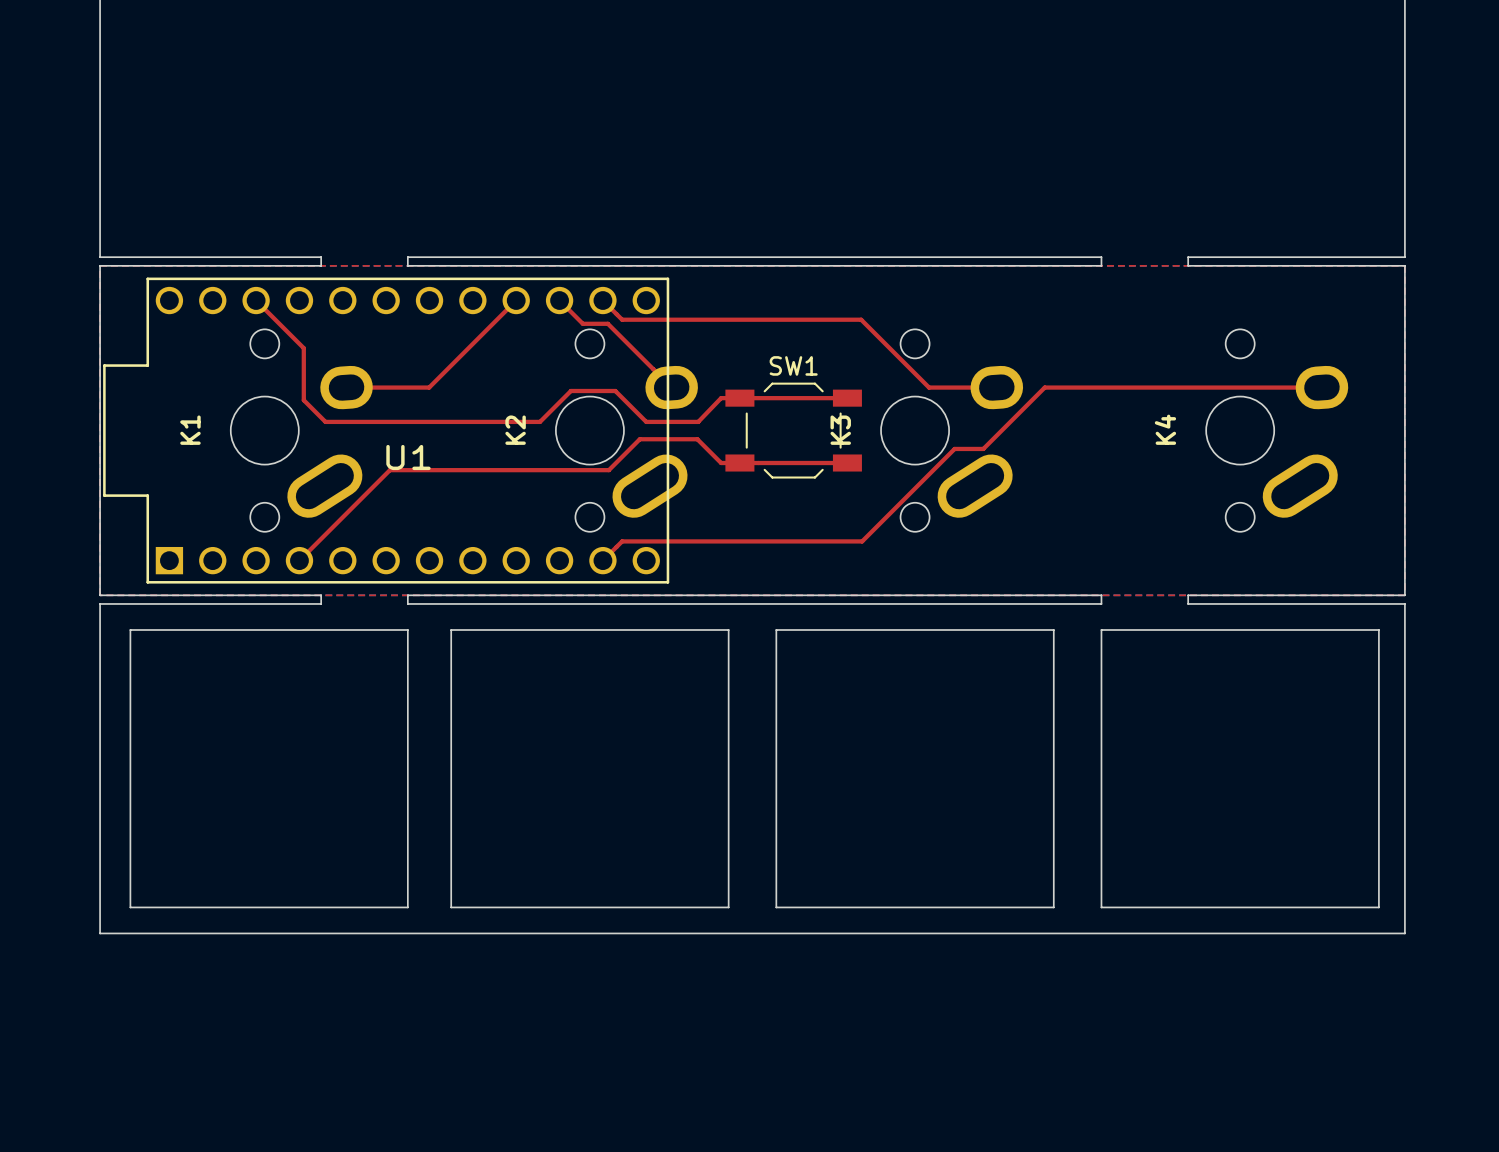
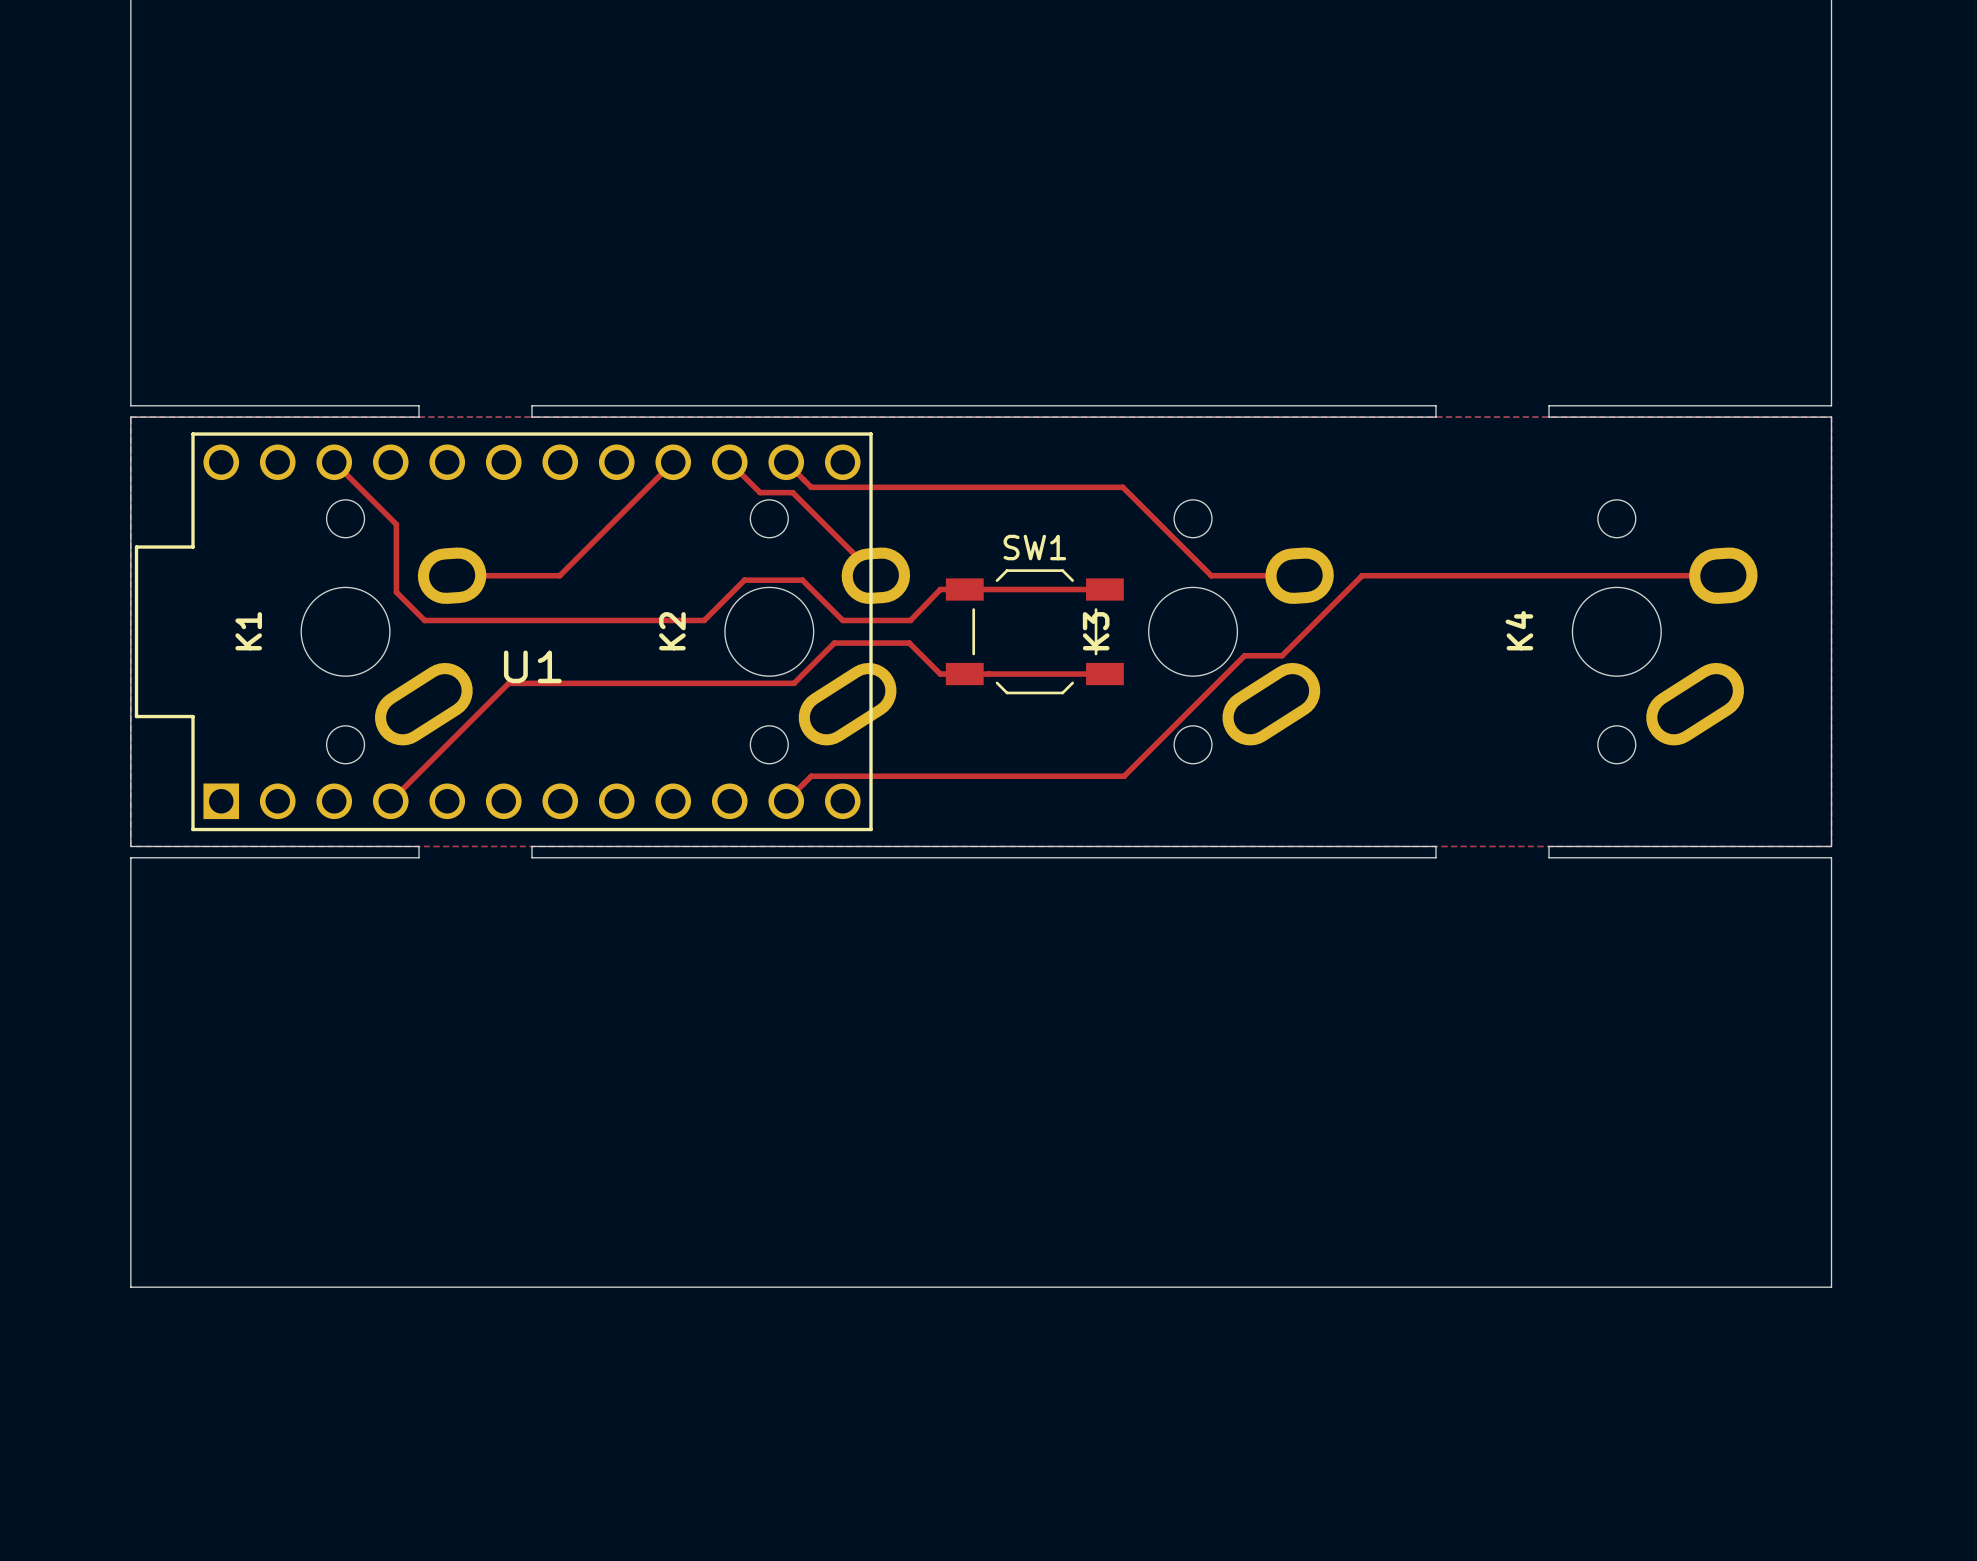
board edge: (130, 629) (407, 629) (407, 907) (130, 907) (130, 629) -> none
board edge: (451, 629) (728, 629) (728, 907) (451, 907) (451, 629) -> none
board edge: (776, 629) (1053, 629) (1053, 907) (776, 907) (776, 629) -> none
board edge: (1101, 629) (1378, 629) (1378, 907) (1101, 907) (1101, 629) -> none

